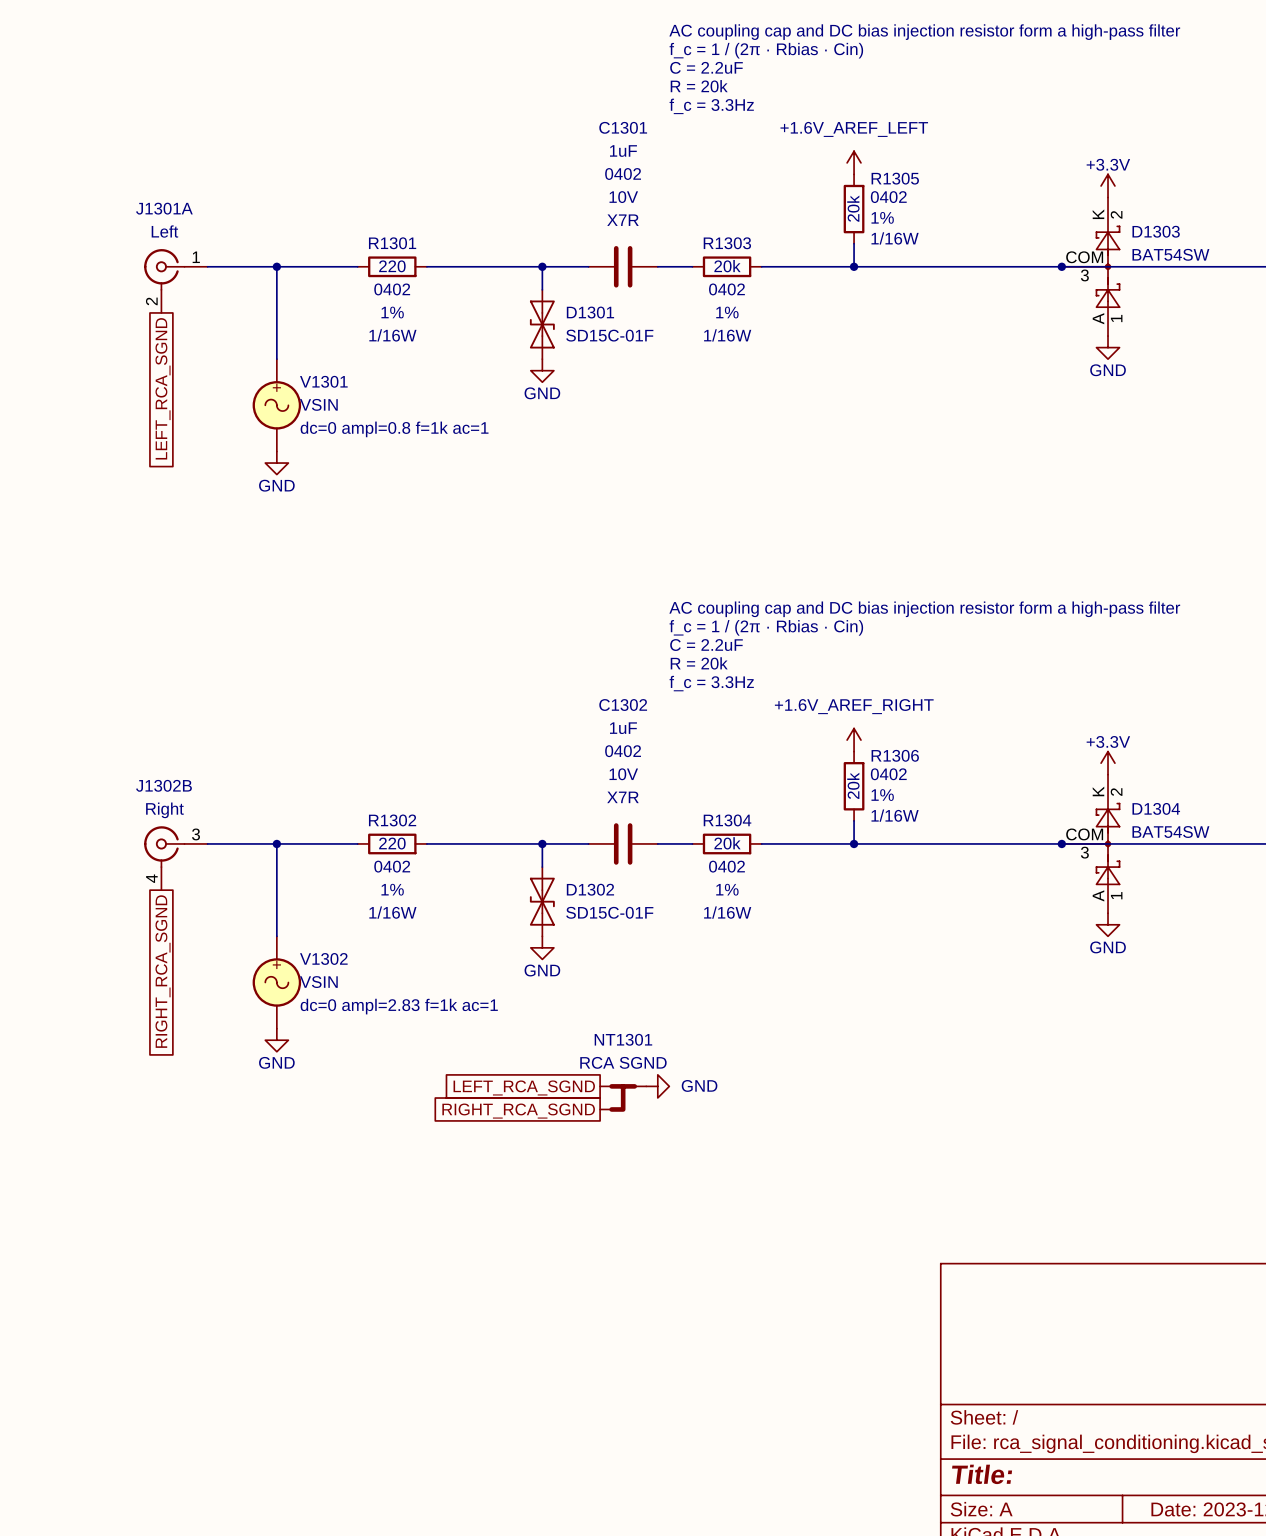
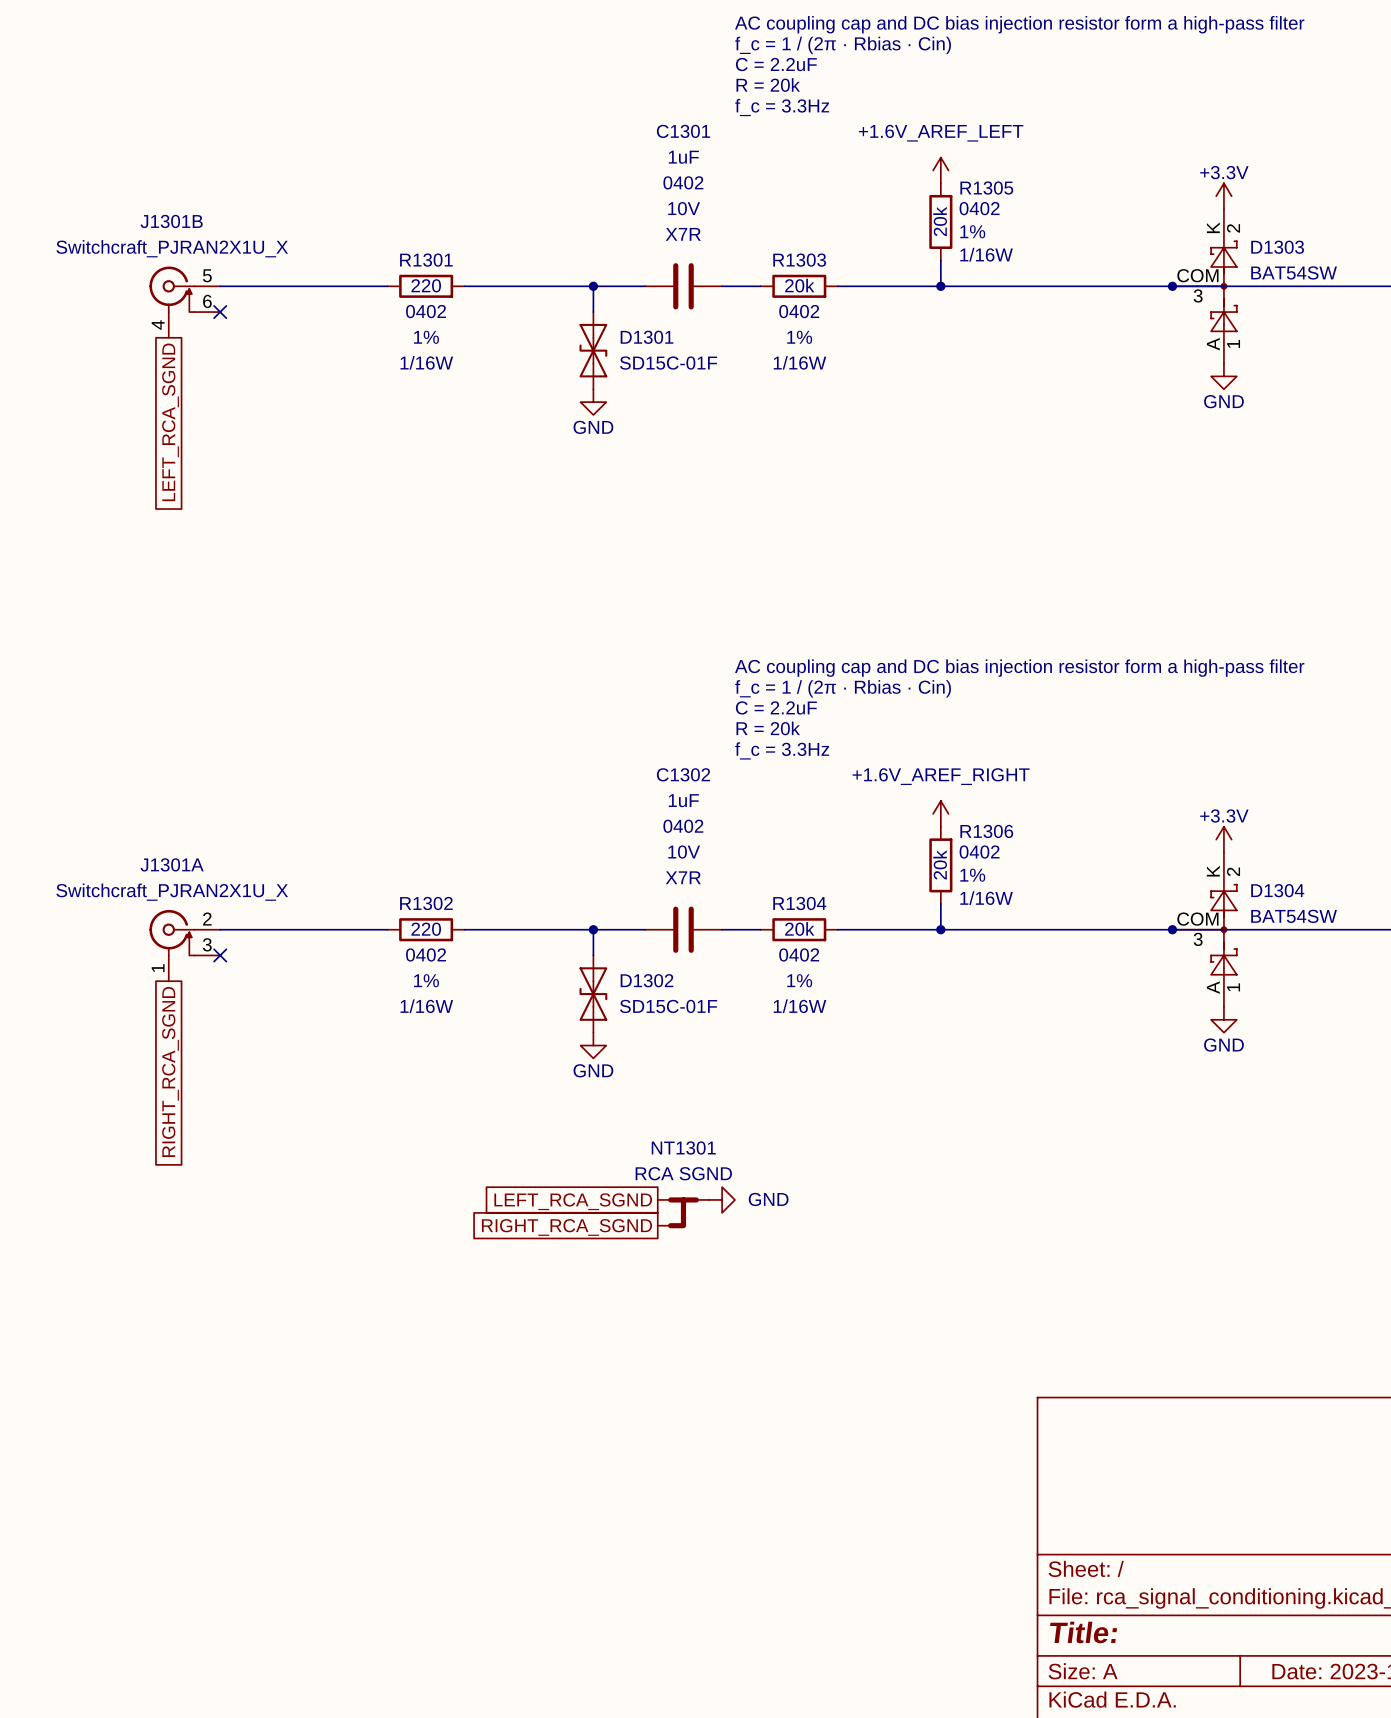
J1301A value: Left (164, 231) -> Switchcraft_PJRAN2X1U_X (172, 892)
J1301A symbol: [144, 249, 208, 313] -> [149, 909, 221, 982]
wire: (276, 266) (276, 359) -> none
junction: (276, 266) -> none
J1301B: none -> Switchcraft_PJRAN2X1U_X (184, 302)
no-connect mark: none -> (220, 312)
V1301: VSIN (276, 405) -> none
power symbol: GND (276, 463) -> none
wire: (276, 843) (276, 936) -> none
junction: (276, 843) -> none
J1302B: Right (175, 858) -> none
no-connect mark: none -> (220, 955)
V1302: VSIN (276, 982) -> none
power symbol: GND (276, 1040) -> none

